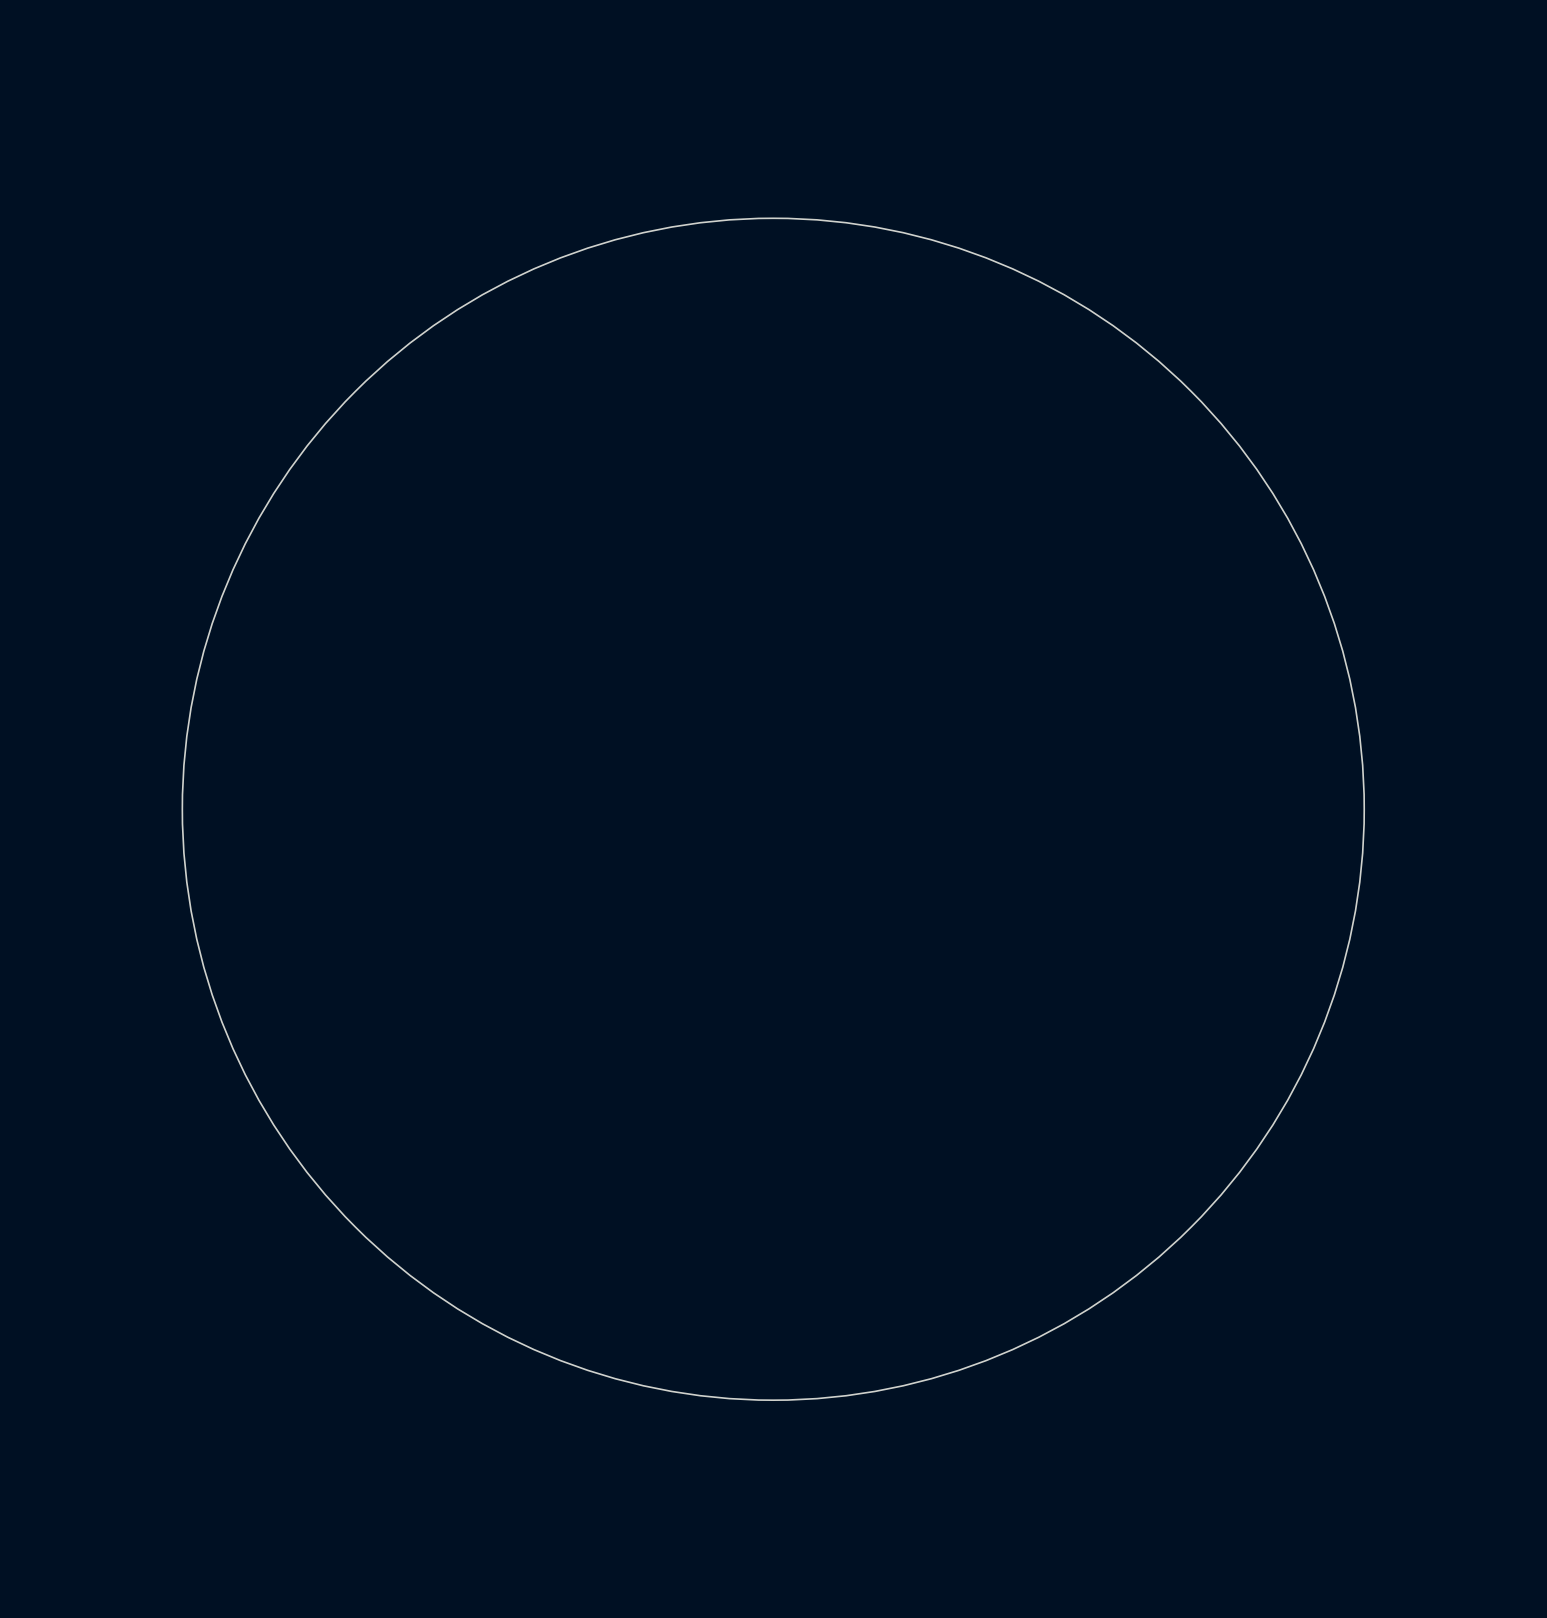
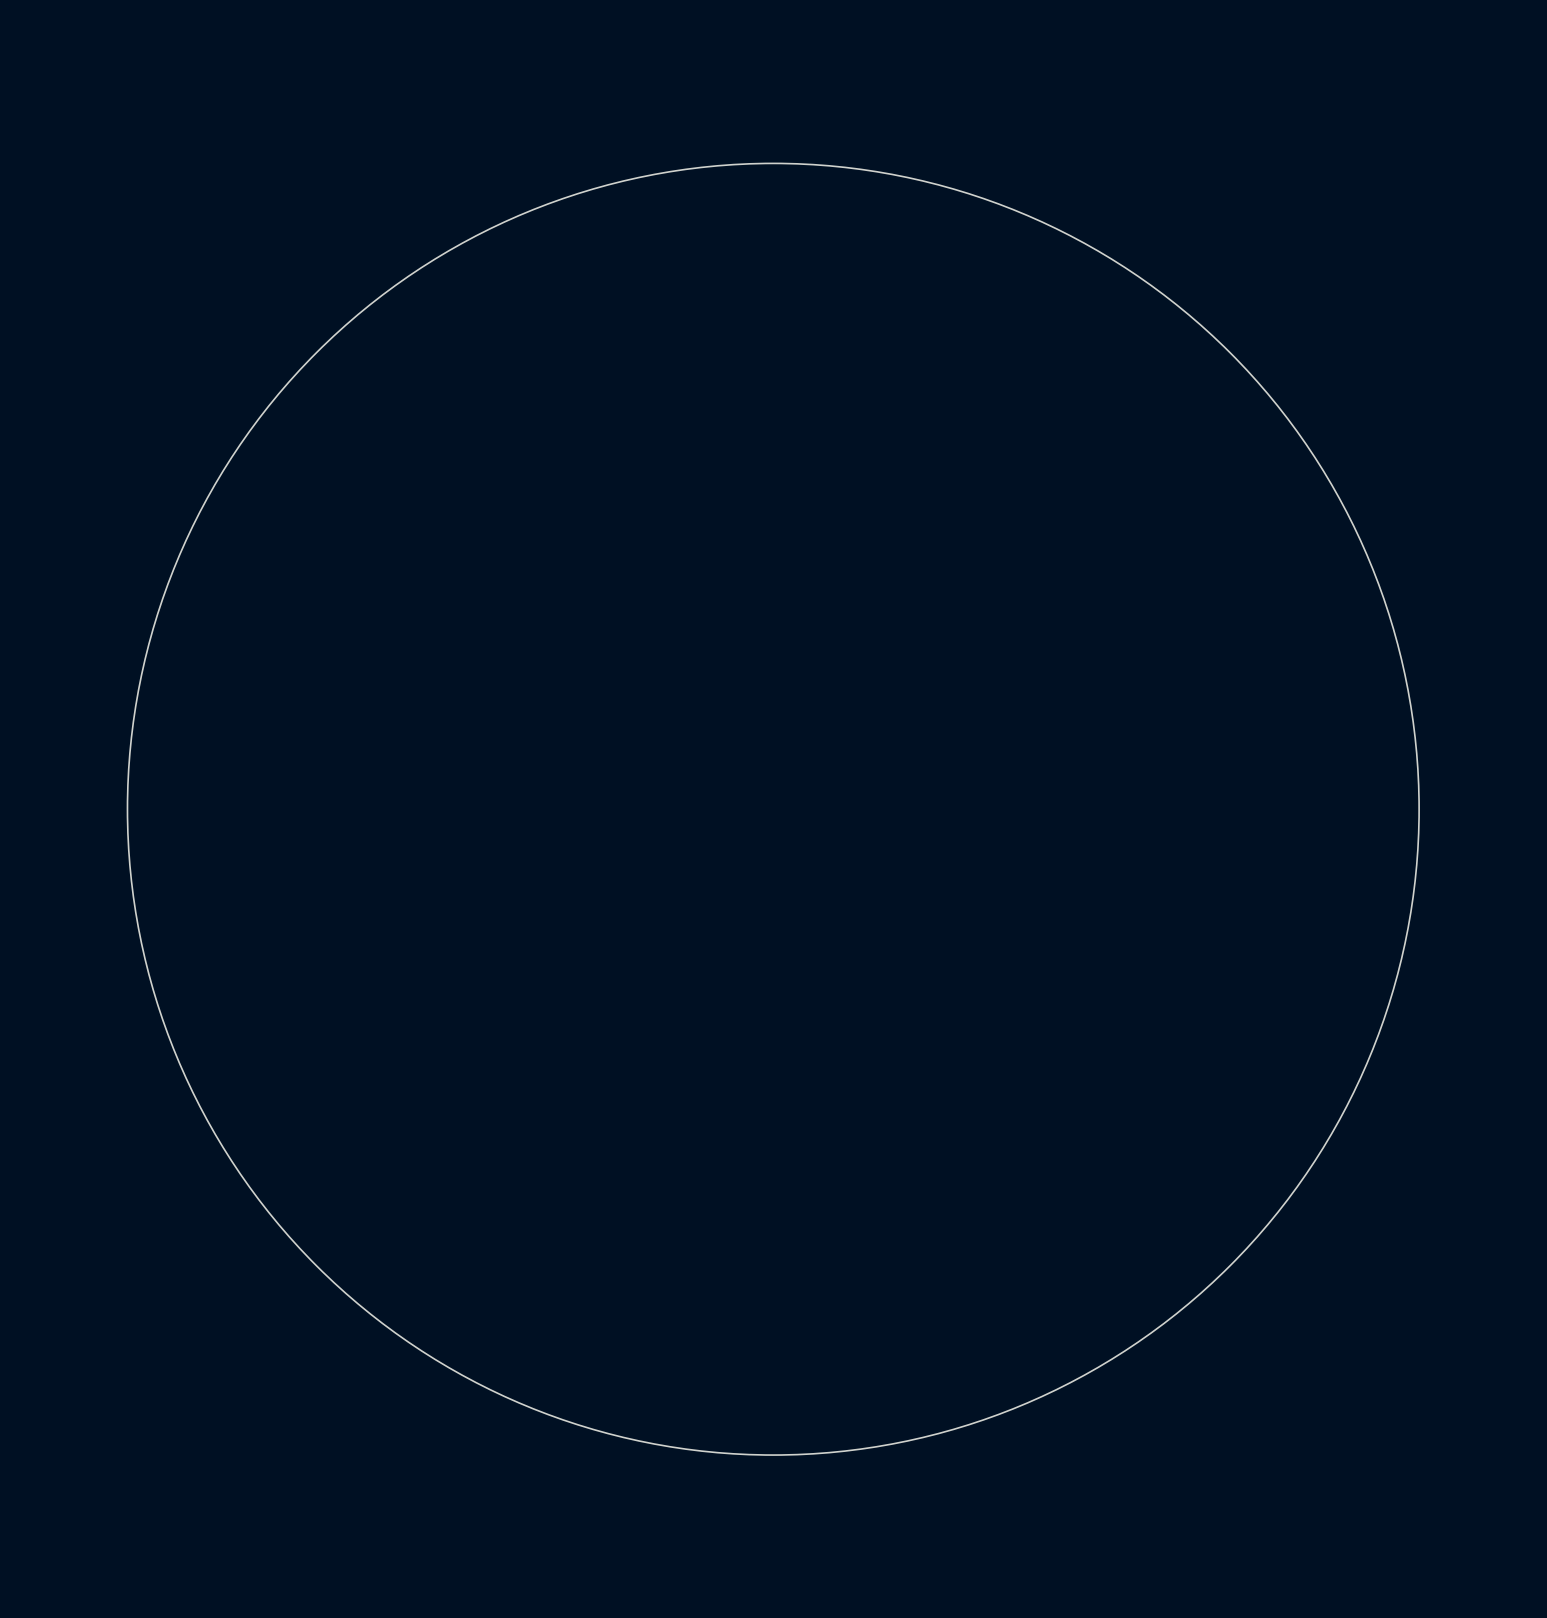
round board edge size: [181, 217, 1366, 1402] -> [126, 162, 1420, 1456]

